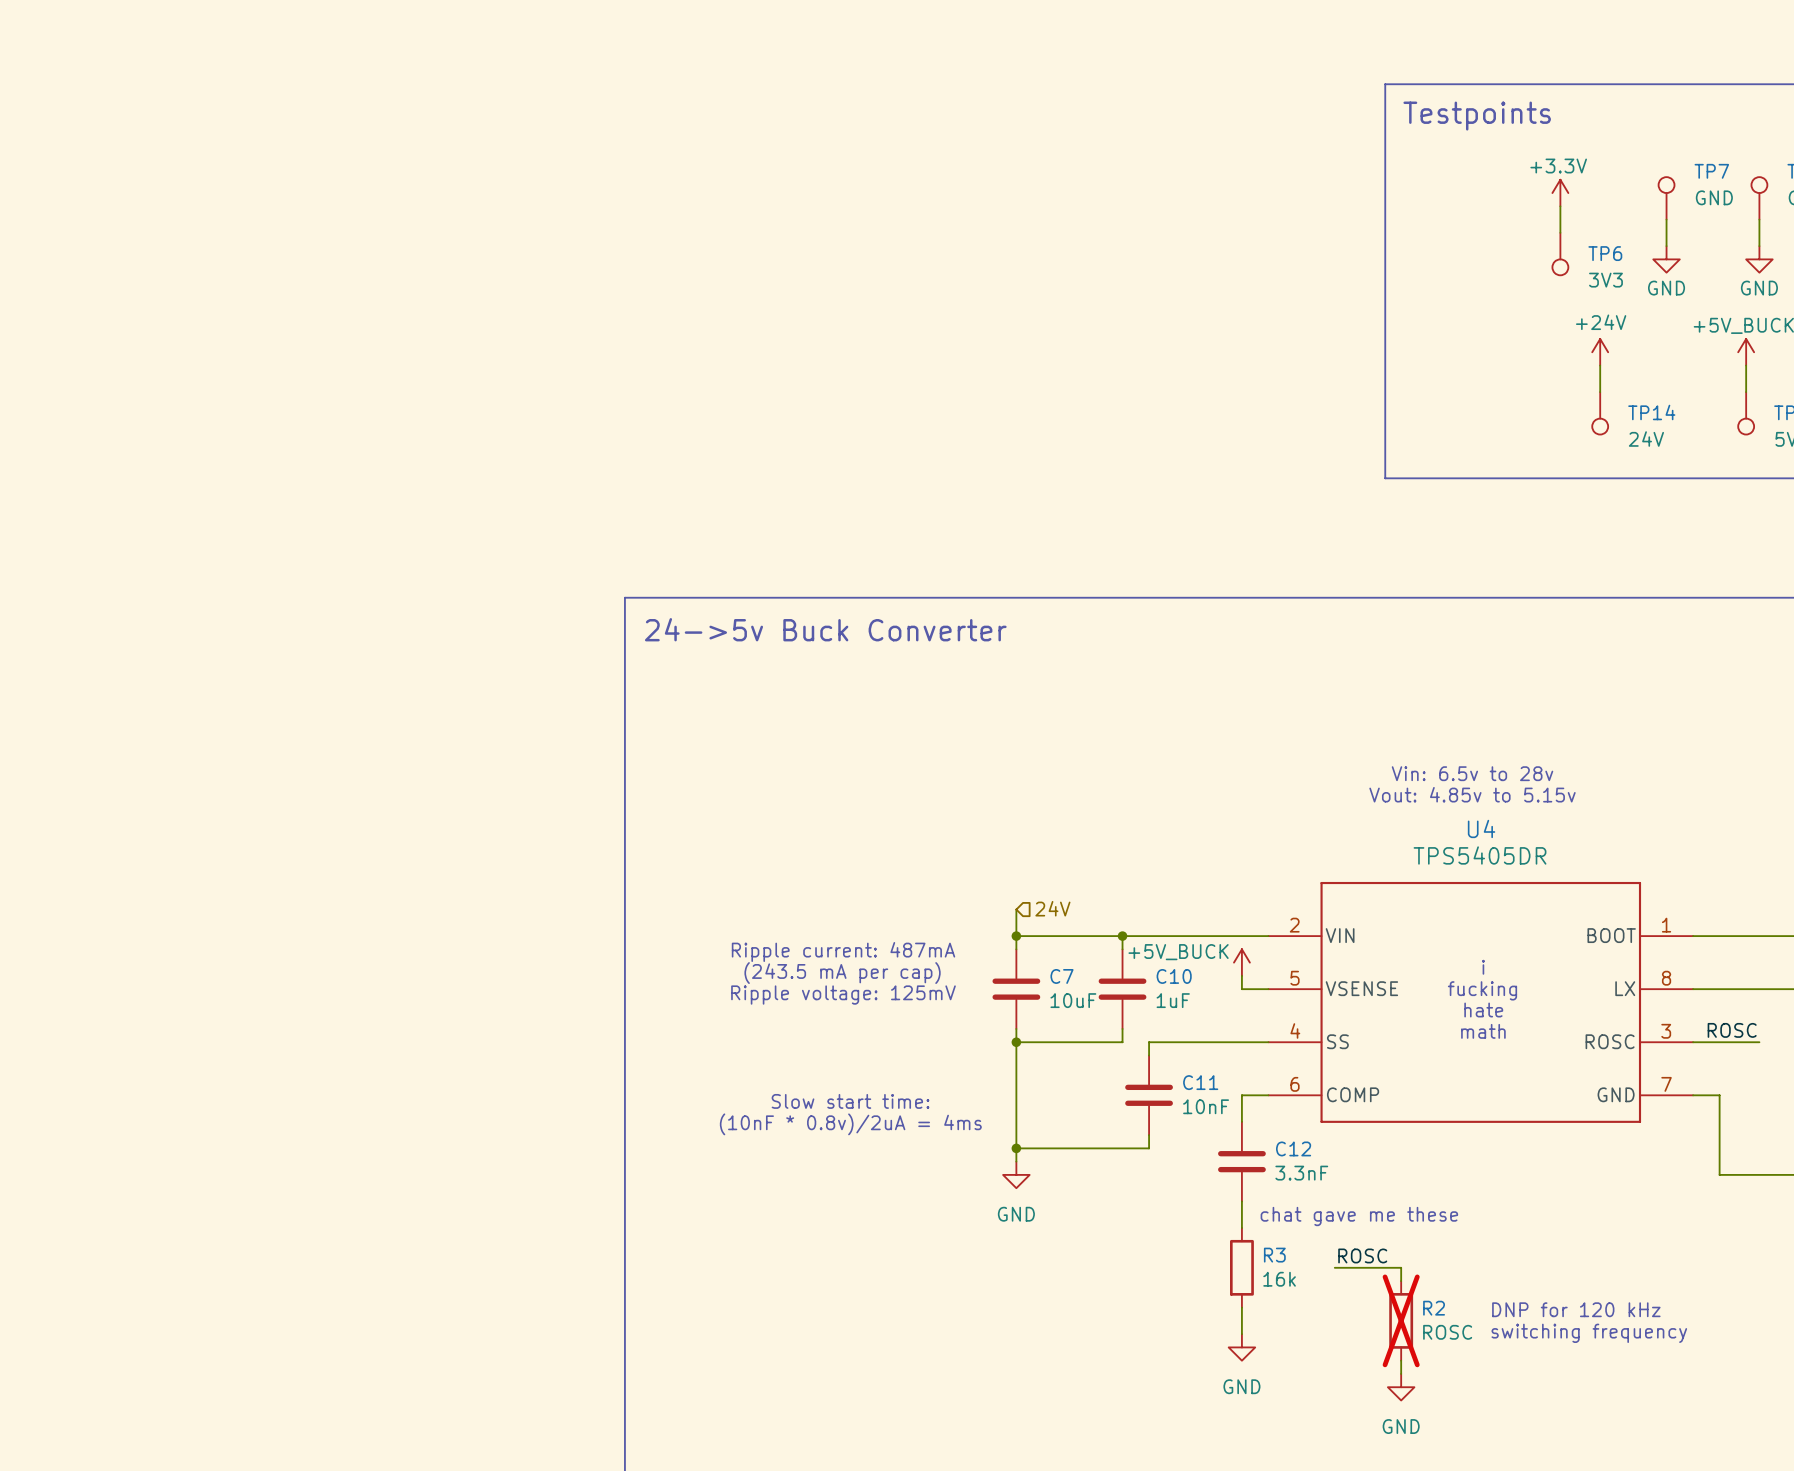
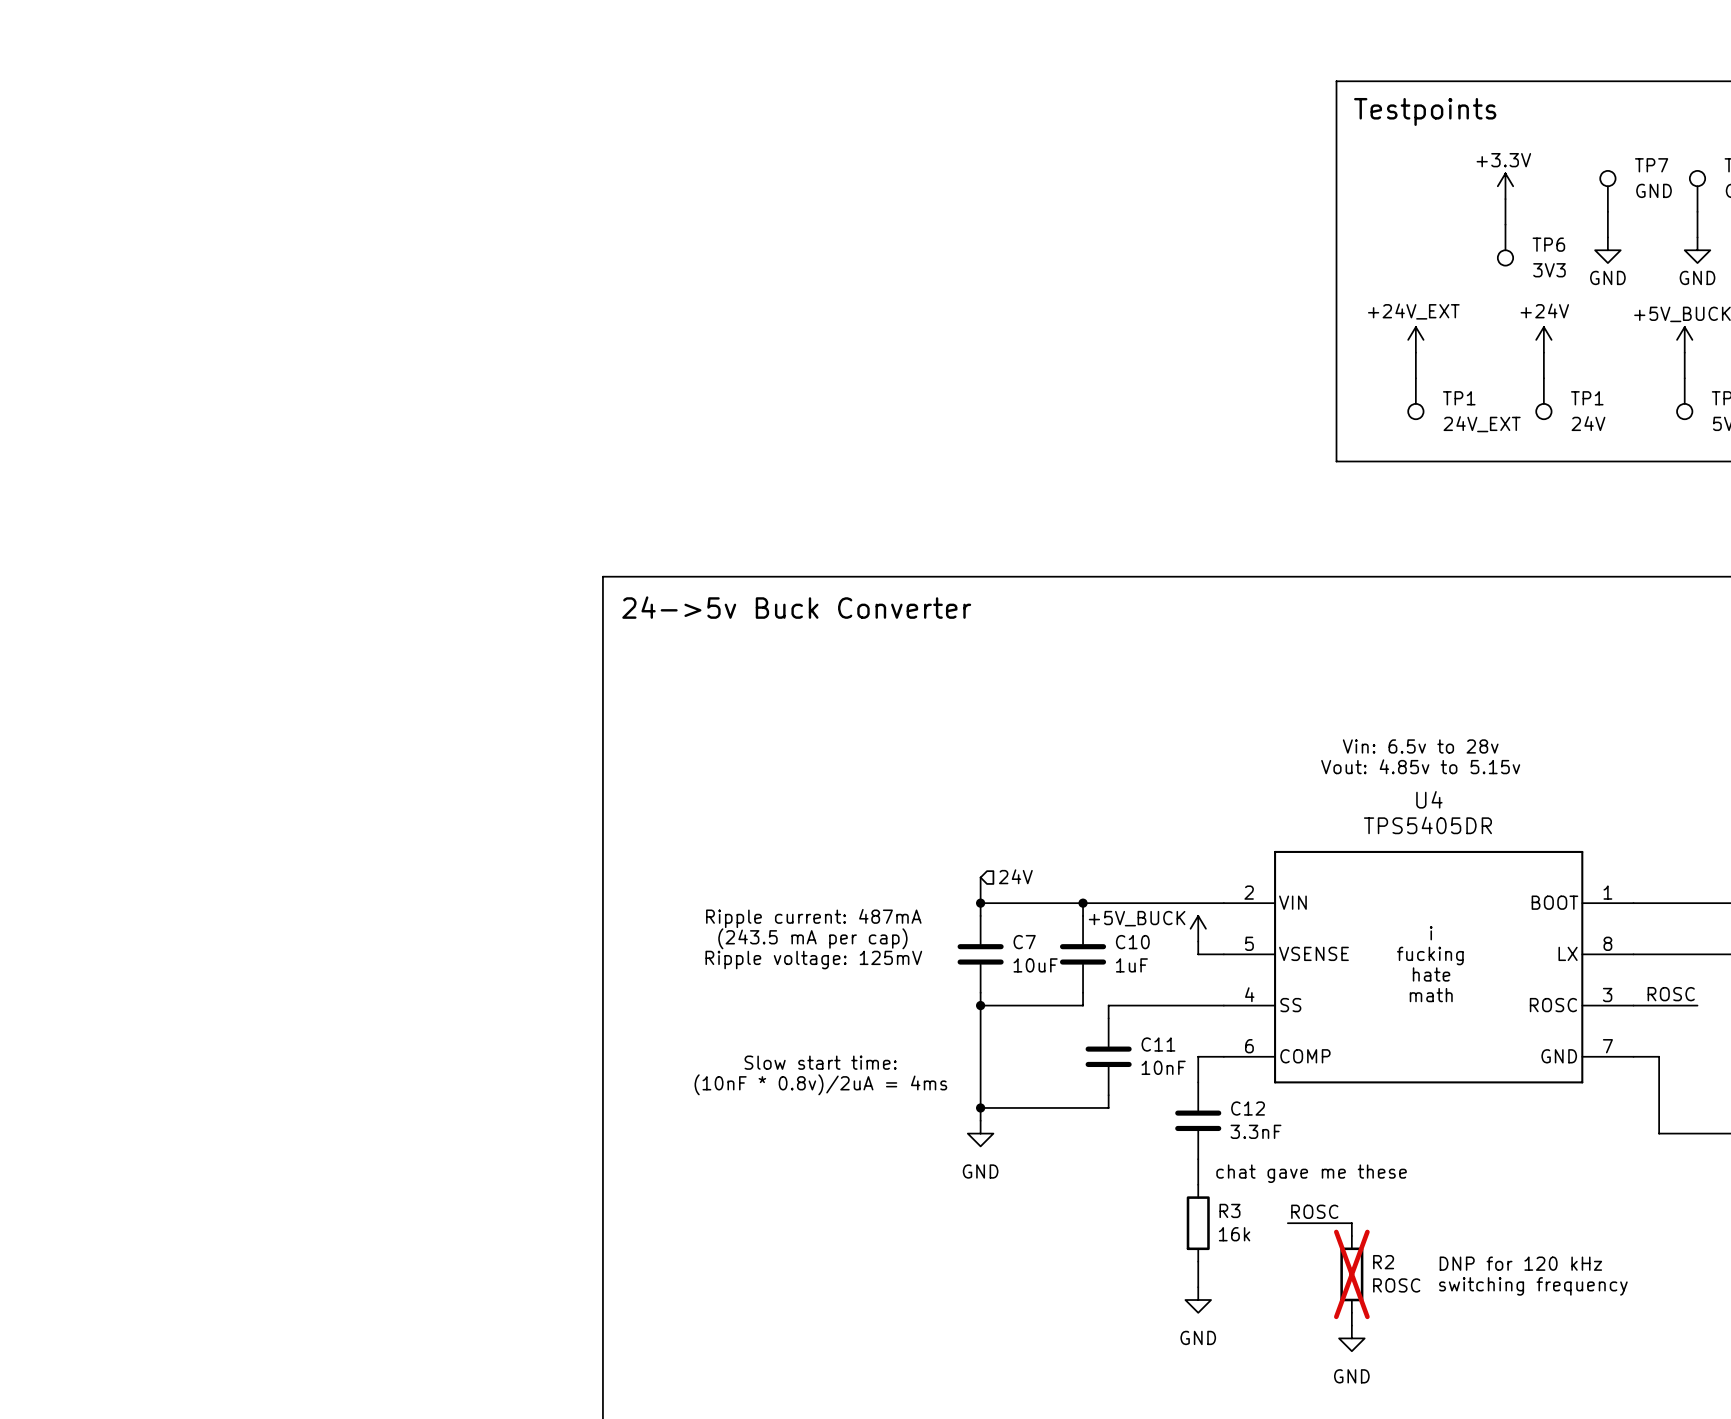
power symbol: none -> +24V_EXT (1415, 339)
wire: none -> (1415, 352) (1415, 378)
TP14 name: TP14 (1651, 412) -> TP1 (1587, 398)
TP1: none -> 24V_EXT (1415, 398)

